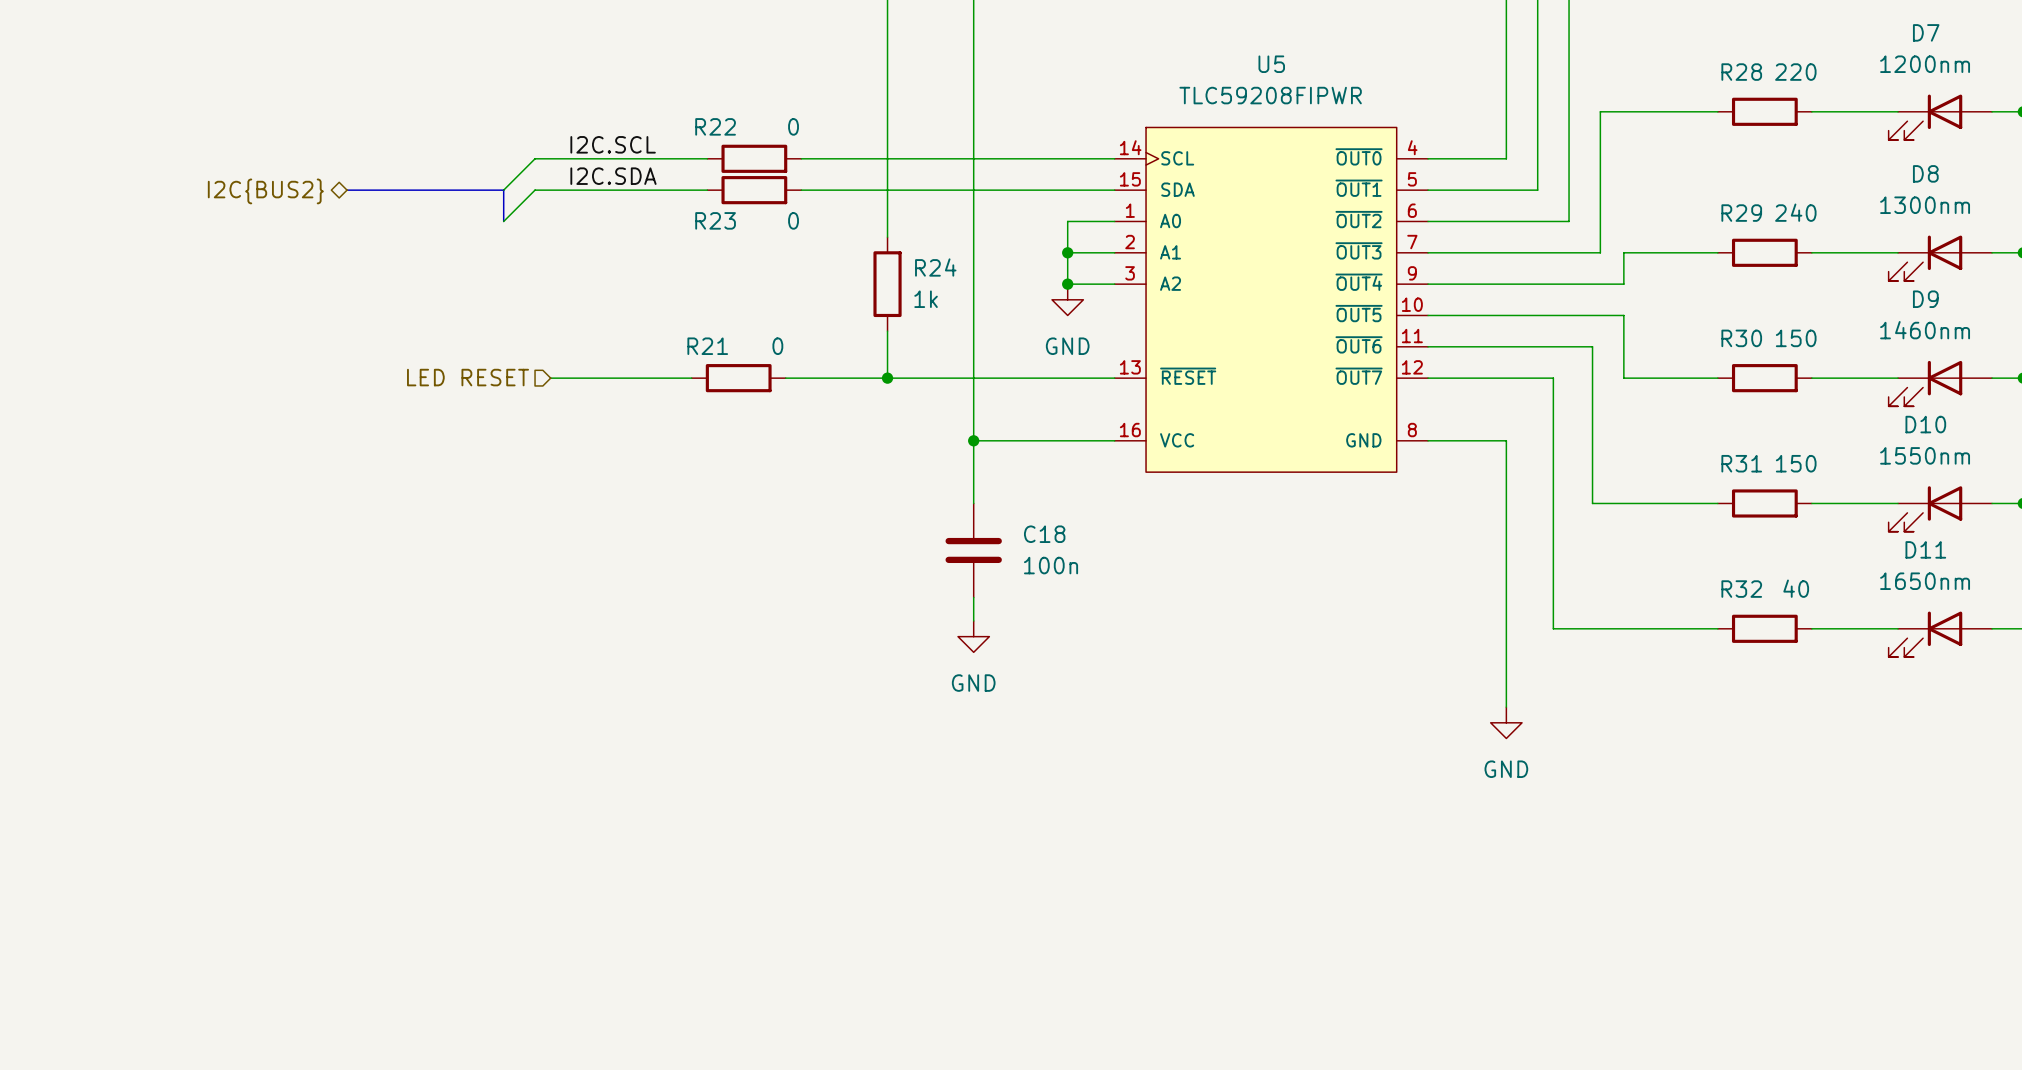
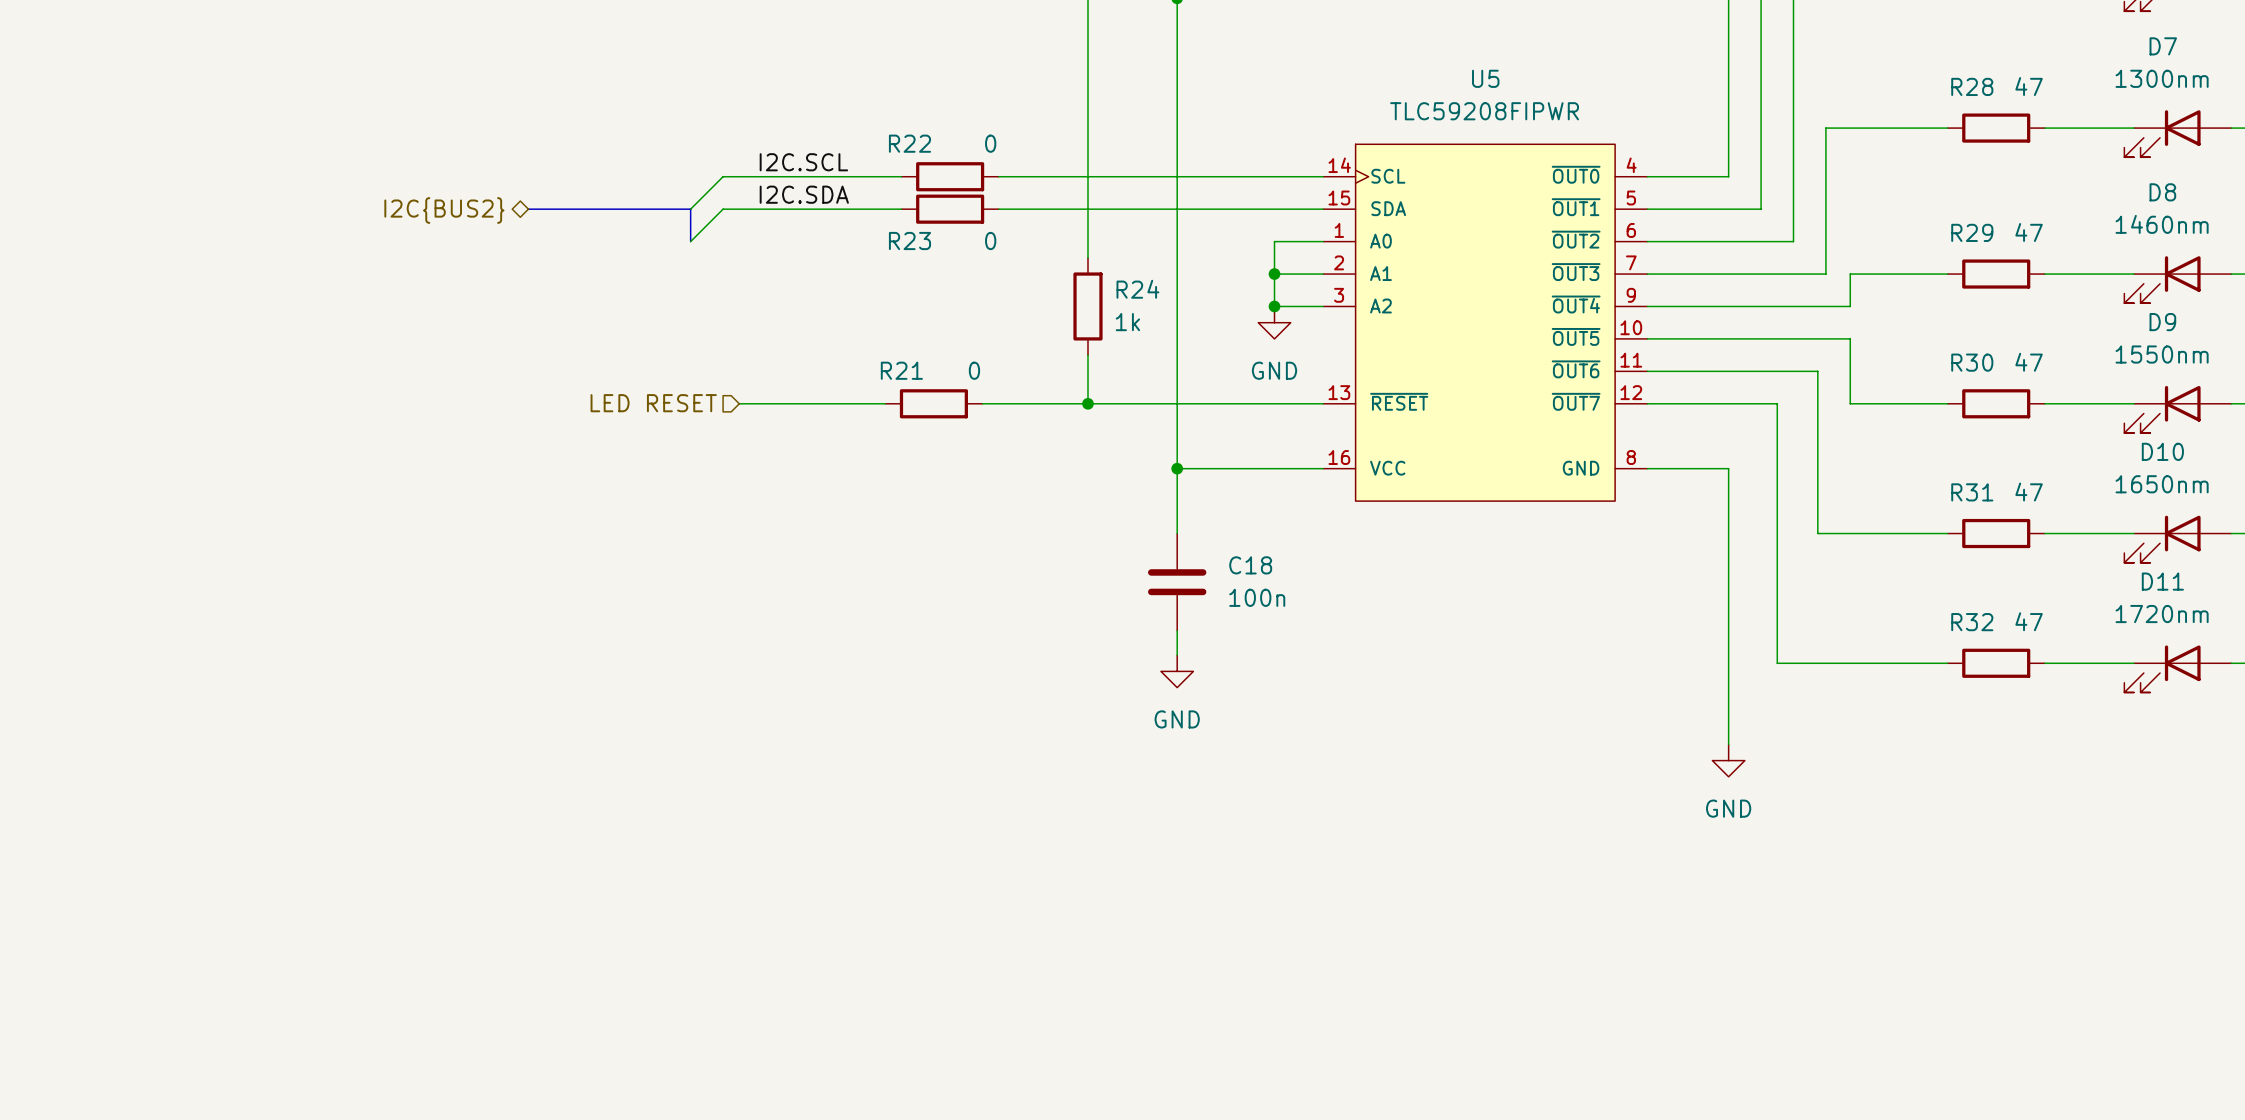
D7 value: 1200nm (1925, 64) -> 1300nm (2162, 78)
R28 value: 220 (1795, 72) -> 47 (2029, 86)
D8 value: 1300nm (1925, 205) -> 1460nm (2162, 224)
R29 value: 240 (1795, 212) -> 47 (2029, 232)
D9 value: 1460nm (1925, 330) -> 1550nm (2162, 354)
R30 value: 150 (1796, 338) -> 47 (2029, 362)
D10 value: 1550nm (1925, 455) -> 1650nm (2162, 484)
R31 value: 150 (1796, 463) -> 47 (2029, 492)
D11 value: 1650nm (1925, 581) -> 1720nm (2162, 614)
R32 value: 40 (1796, 588) -> 47 (2029, 621)

